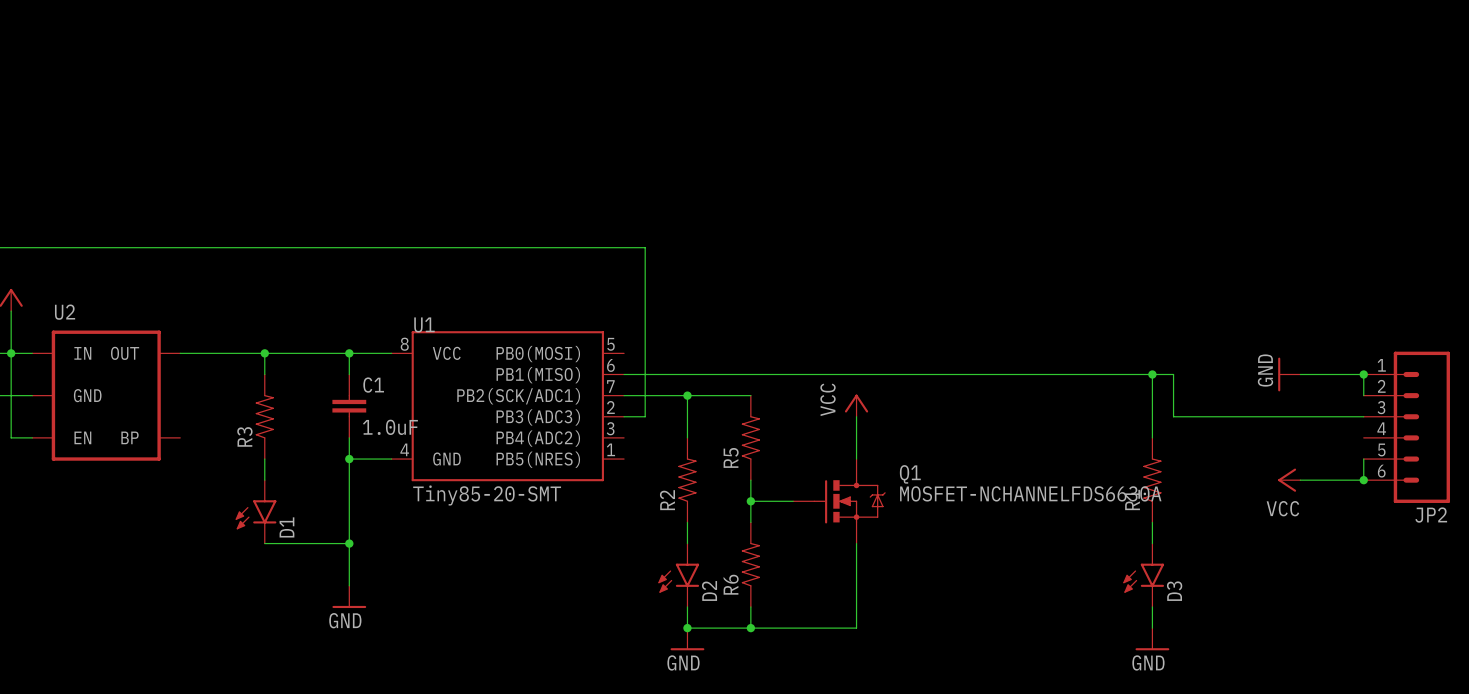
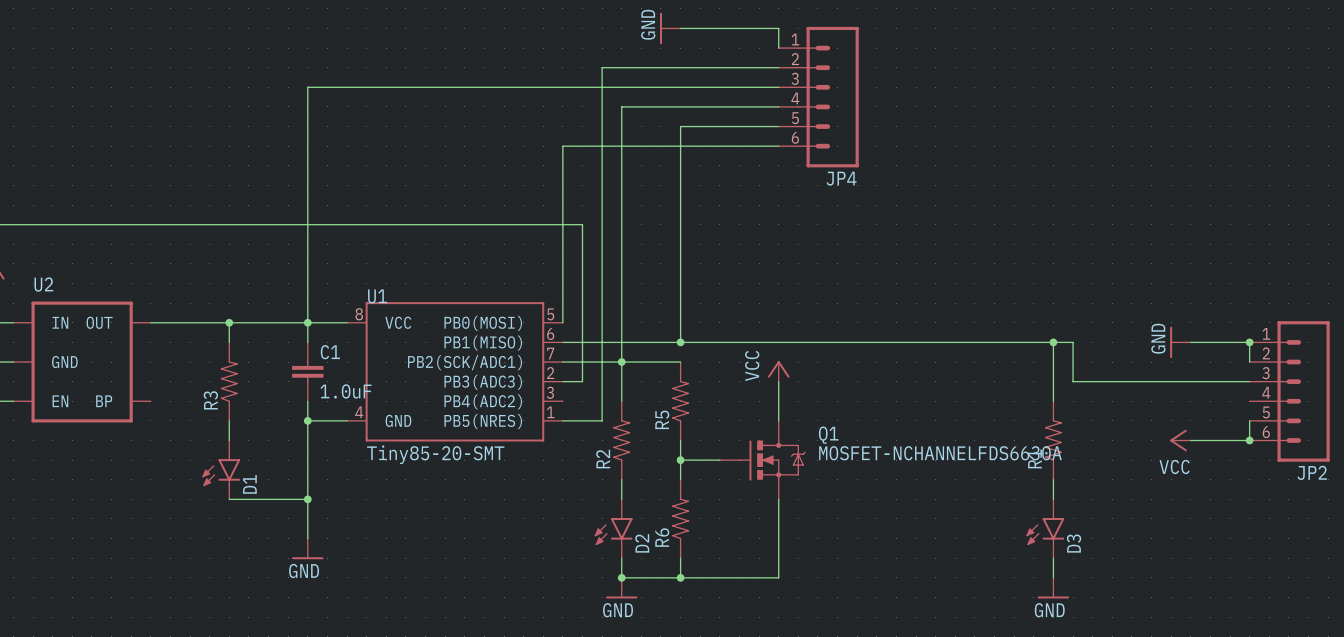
power symbol: none -> GND (670, 28)
wire: none -> (680, 28) (778, 28) (778, 48)
wire: none -> (778, 67) (602, 67) (602, 420) (562, 420)
wire: none -> (778, 87) (307, 87) (307, 322)
JP4: none -> (818, 97)
wire: none -> (778, 106) (621, 106) (621, 362)
wire: none -> (778, 126) (680, 126) (680, 342)
wire: none -> (778, 146) (562, 146) (562, 322)
junction: none -> (680, 342)

